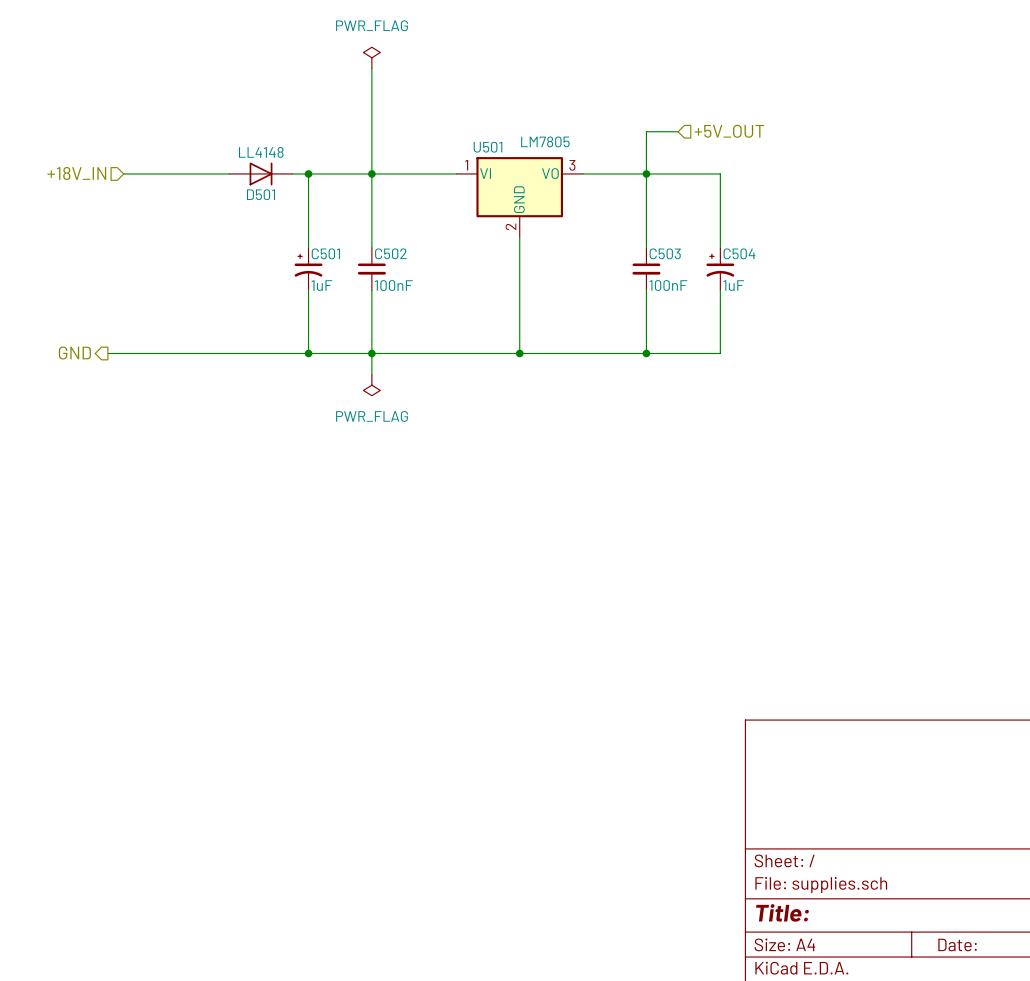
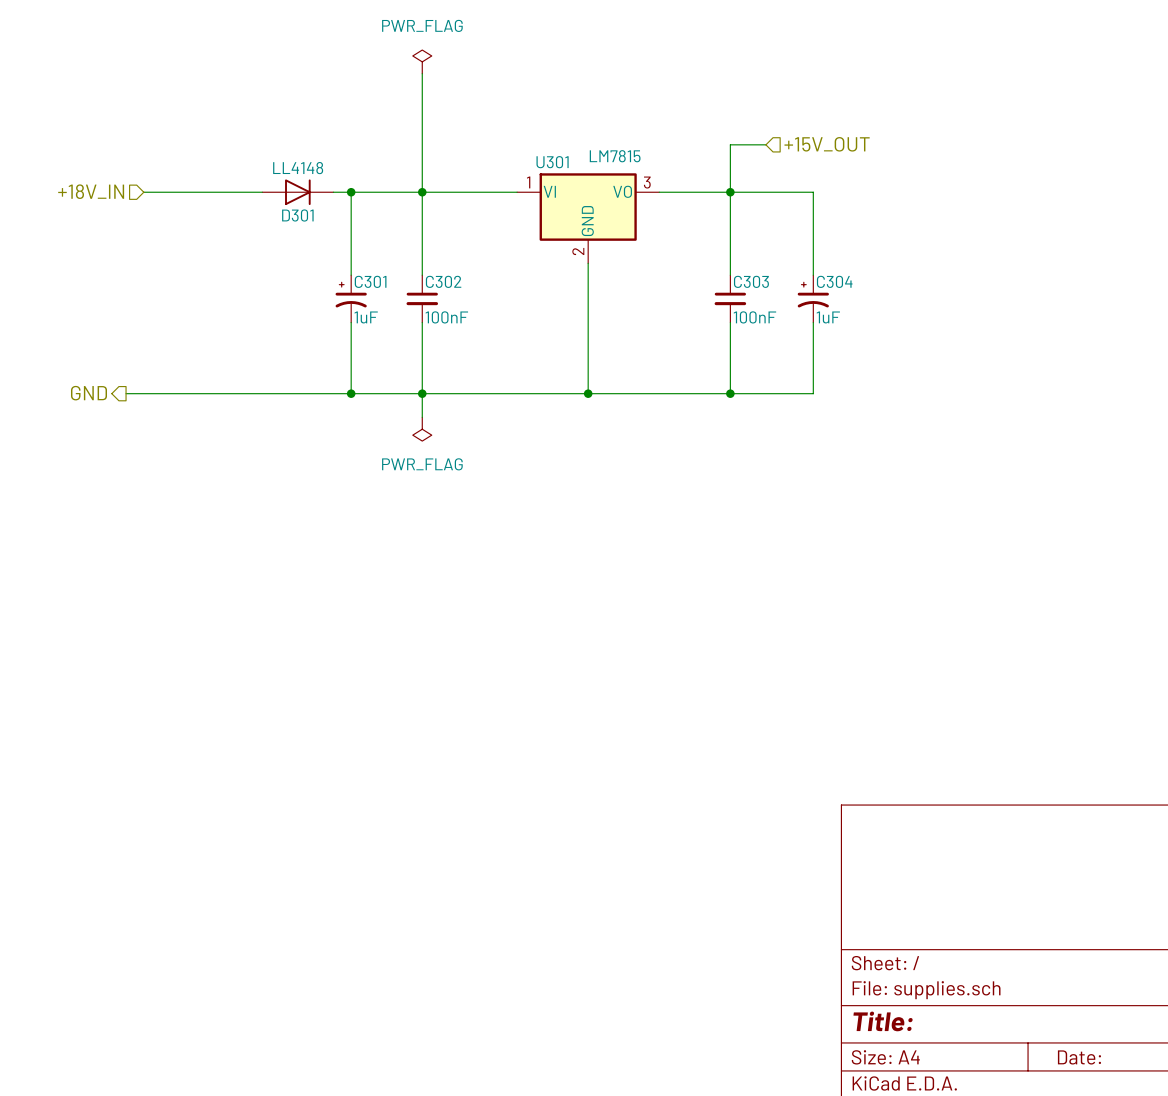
hierarchical label: +5V_OUT (729, 131) -> +15V_OUT (827, 144)
U501 value: LM7805 (545, 141) -> LM7815 (615, 156)
U501 name: U501 (487, 147) -> U301 (552, 162)
D501 name: D501 (261, 194) -> D301 (297, 215)
C501 name: C501 (325, 253) -> C301 (370, 281)
C502 name: C502 (390, 253) -> C302 (443, 281)
C503 name: C503 (665, 253) -> C303 (751, 281)
C504 name: C504 (739, 253) -> C304 (834, 281)

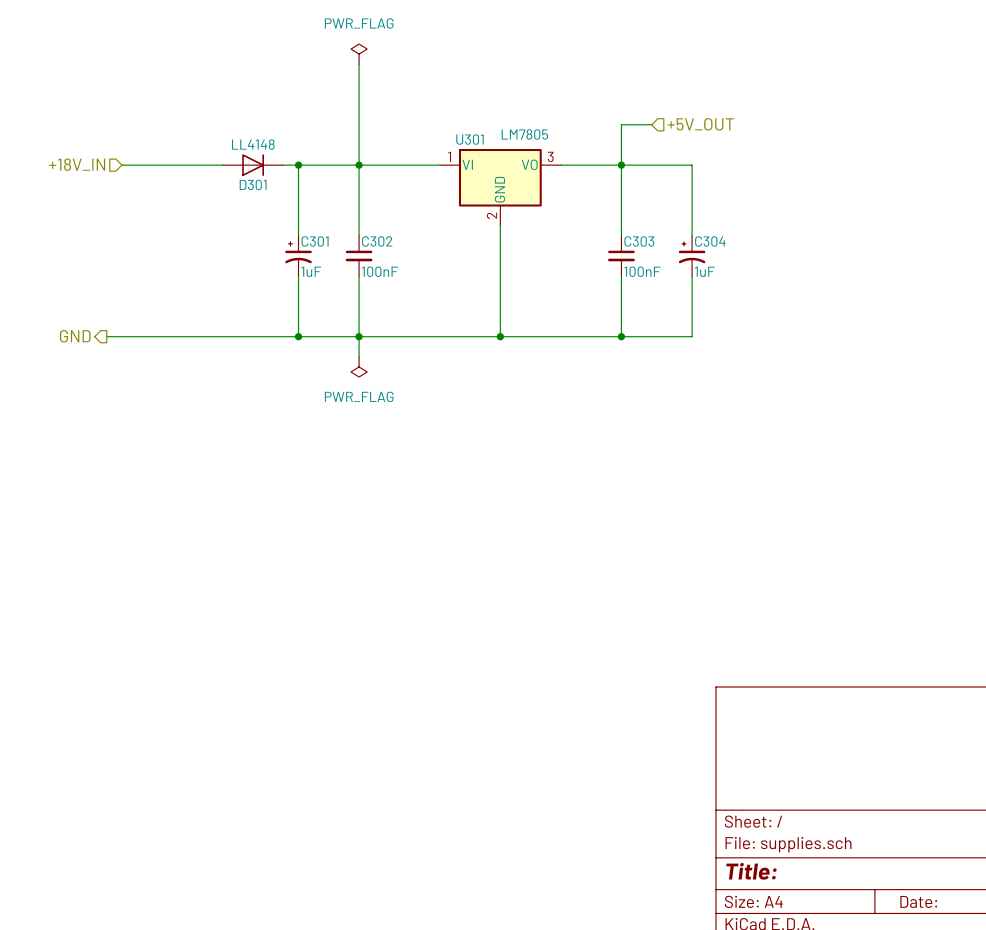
hierarchical label: +15V_OUT (827, 144) -> +5V_OUT (700, 124)
U301 value: LM7815 (615, 156) -> LM7805 (524, 134)

